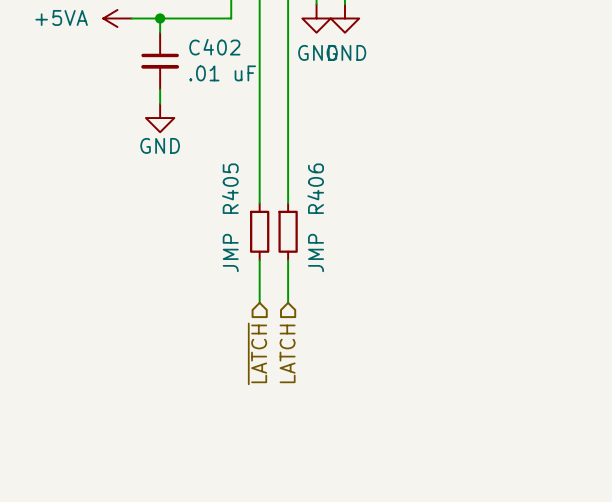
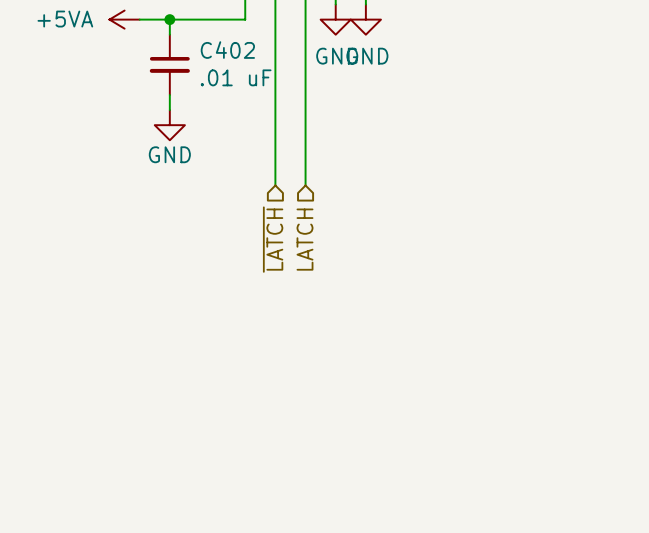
wire: (259, 174) (259, 203) -> none
wire: (288, 174) (288, 203) -> none
R405: JMP (259, 231) -> none
R406: JMP (288, 231) -> none
wire: (259, 260) (259, 302) -> none
wire: (288, 260) (288, 302) -> none
hierarchical label position: ~{LATCH} (257, 353) -> ~{LATCH} (273, 239)
hierarchical label position: LATCH (287, 353) -> LATCH (305, 239)

